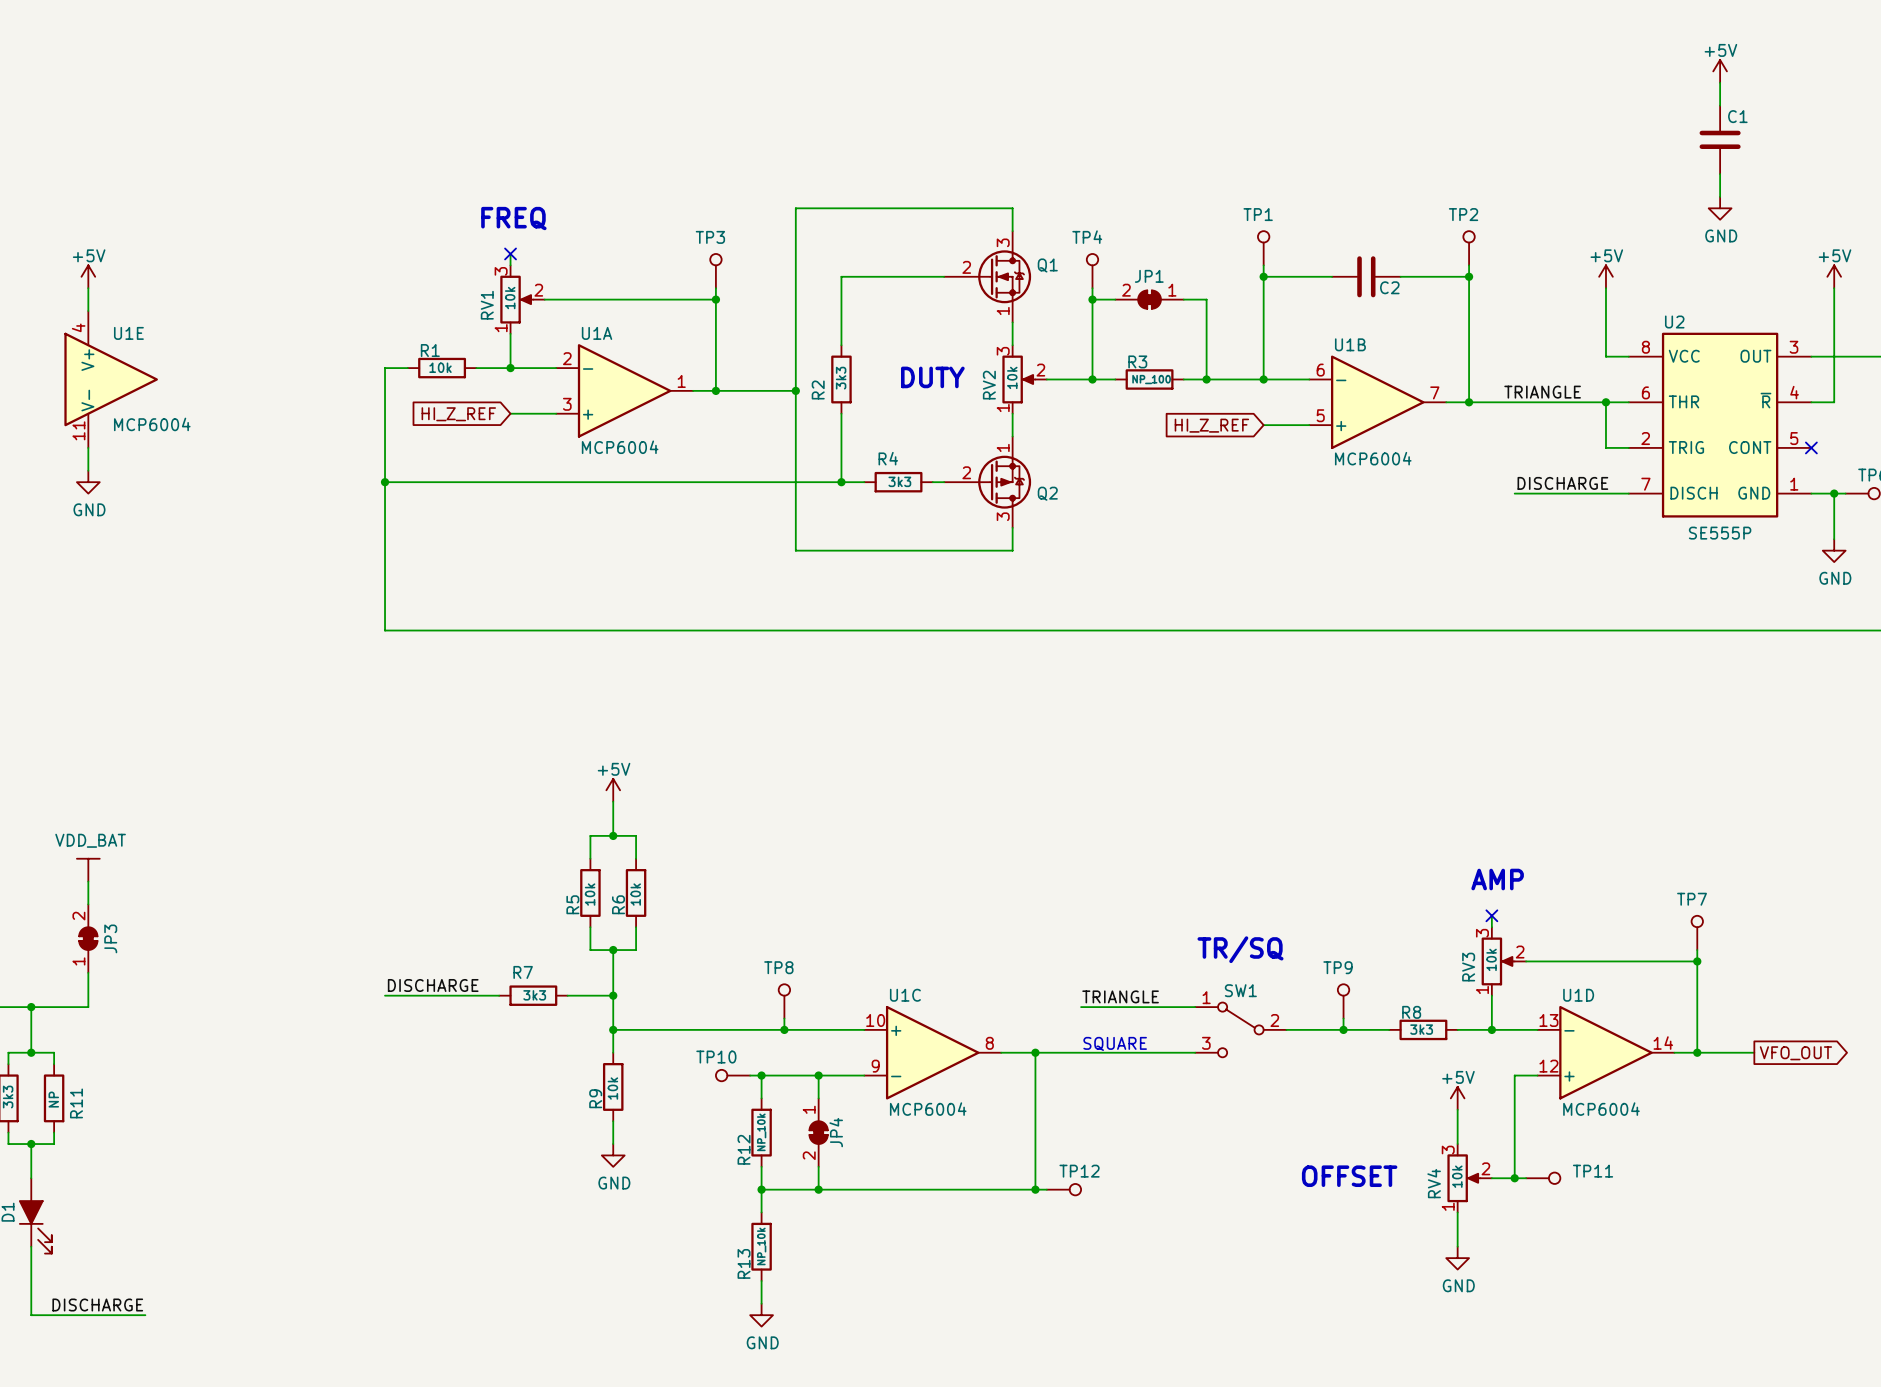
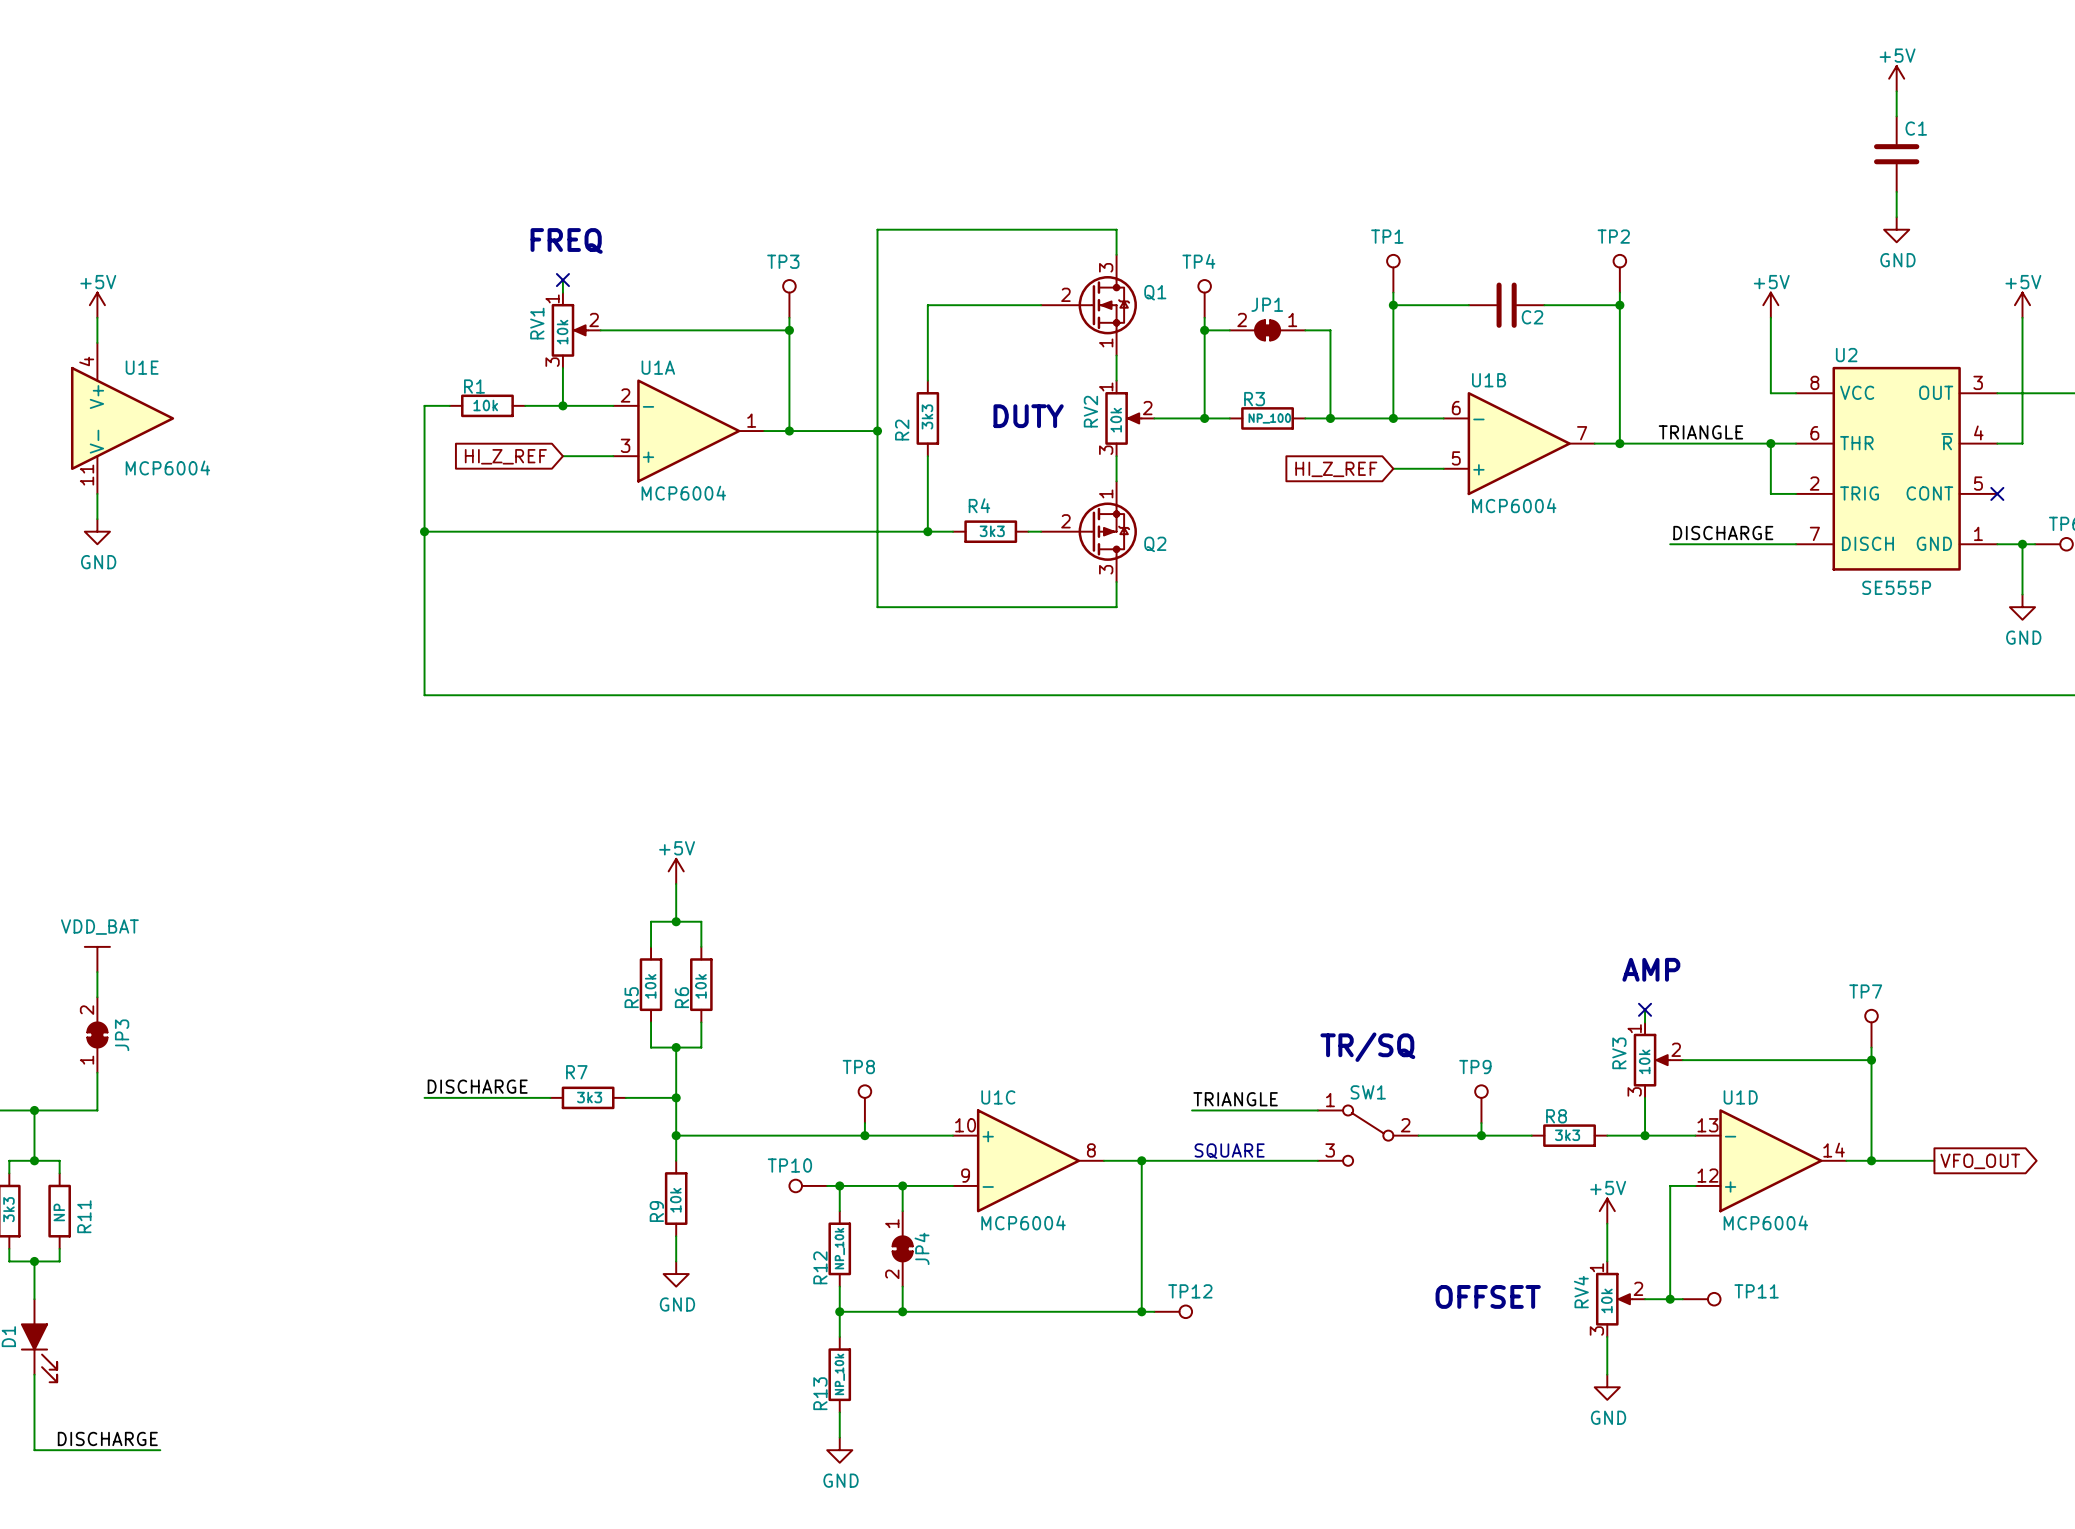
RV1 flip: as is (516, 299) -> up-down (569, 330)
RV2 flip: as is (1018, 379) -> up-down (1123, 418)
RV3 flip: as is (1498, 961) -> up-down (1651, 1060)
RV4 flip: as is (1463, 1178) -> up-down (1614, 1299)

